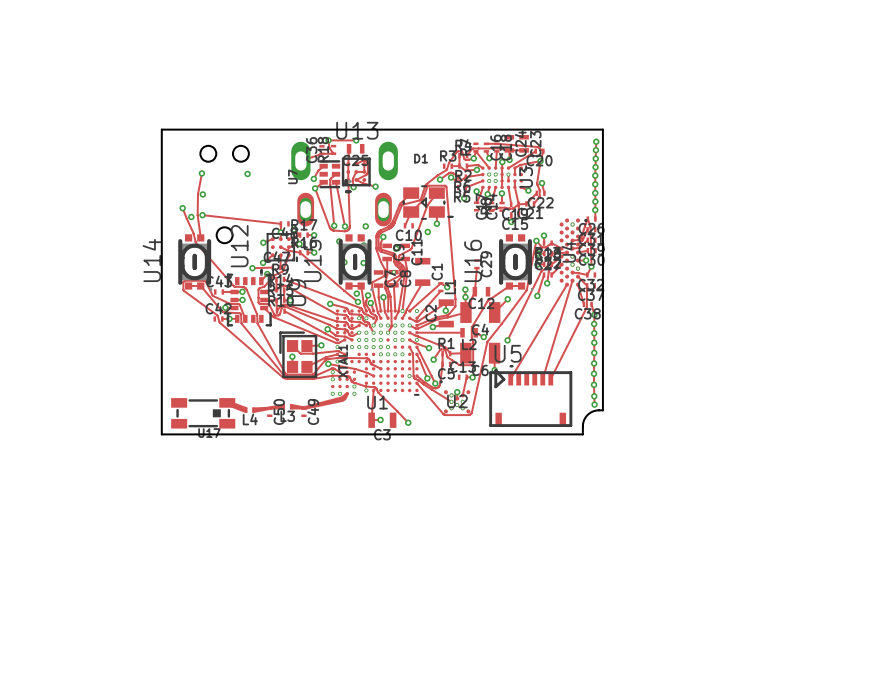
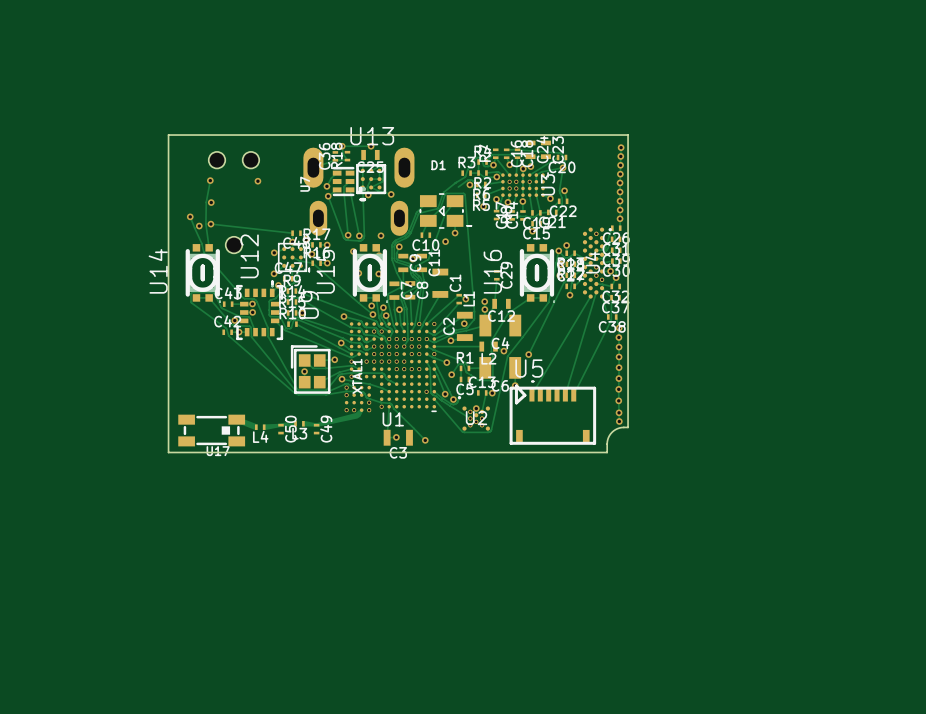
via: (440, 179) -> none
track: (272, 267) (252, 268) -> none
via: (252, 268) -> none
track: (544, 274) (537, 296) -> none
via: (537, 296) -> none
track: (507, 299) (494, 312) -> none
via: (507, 299) -> none

